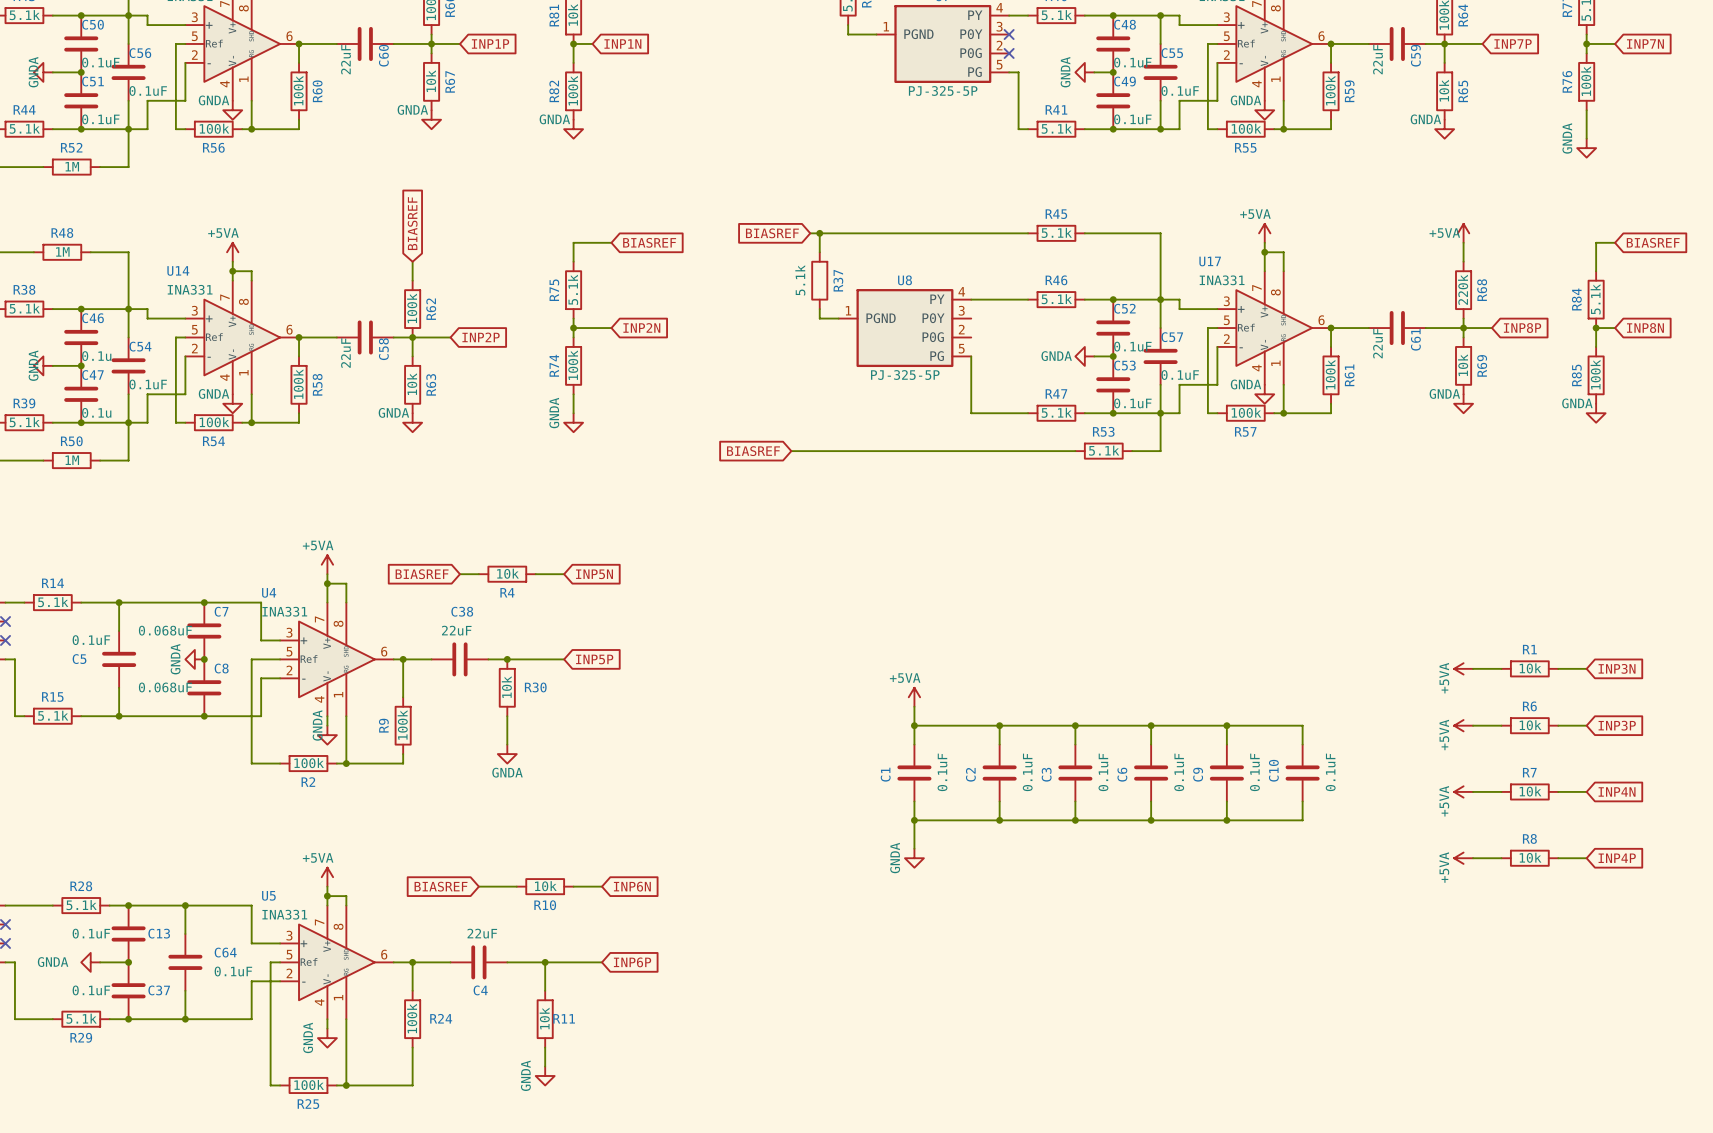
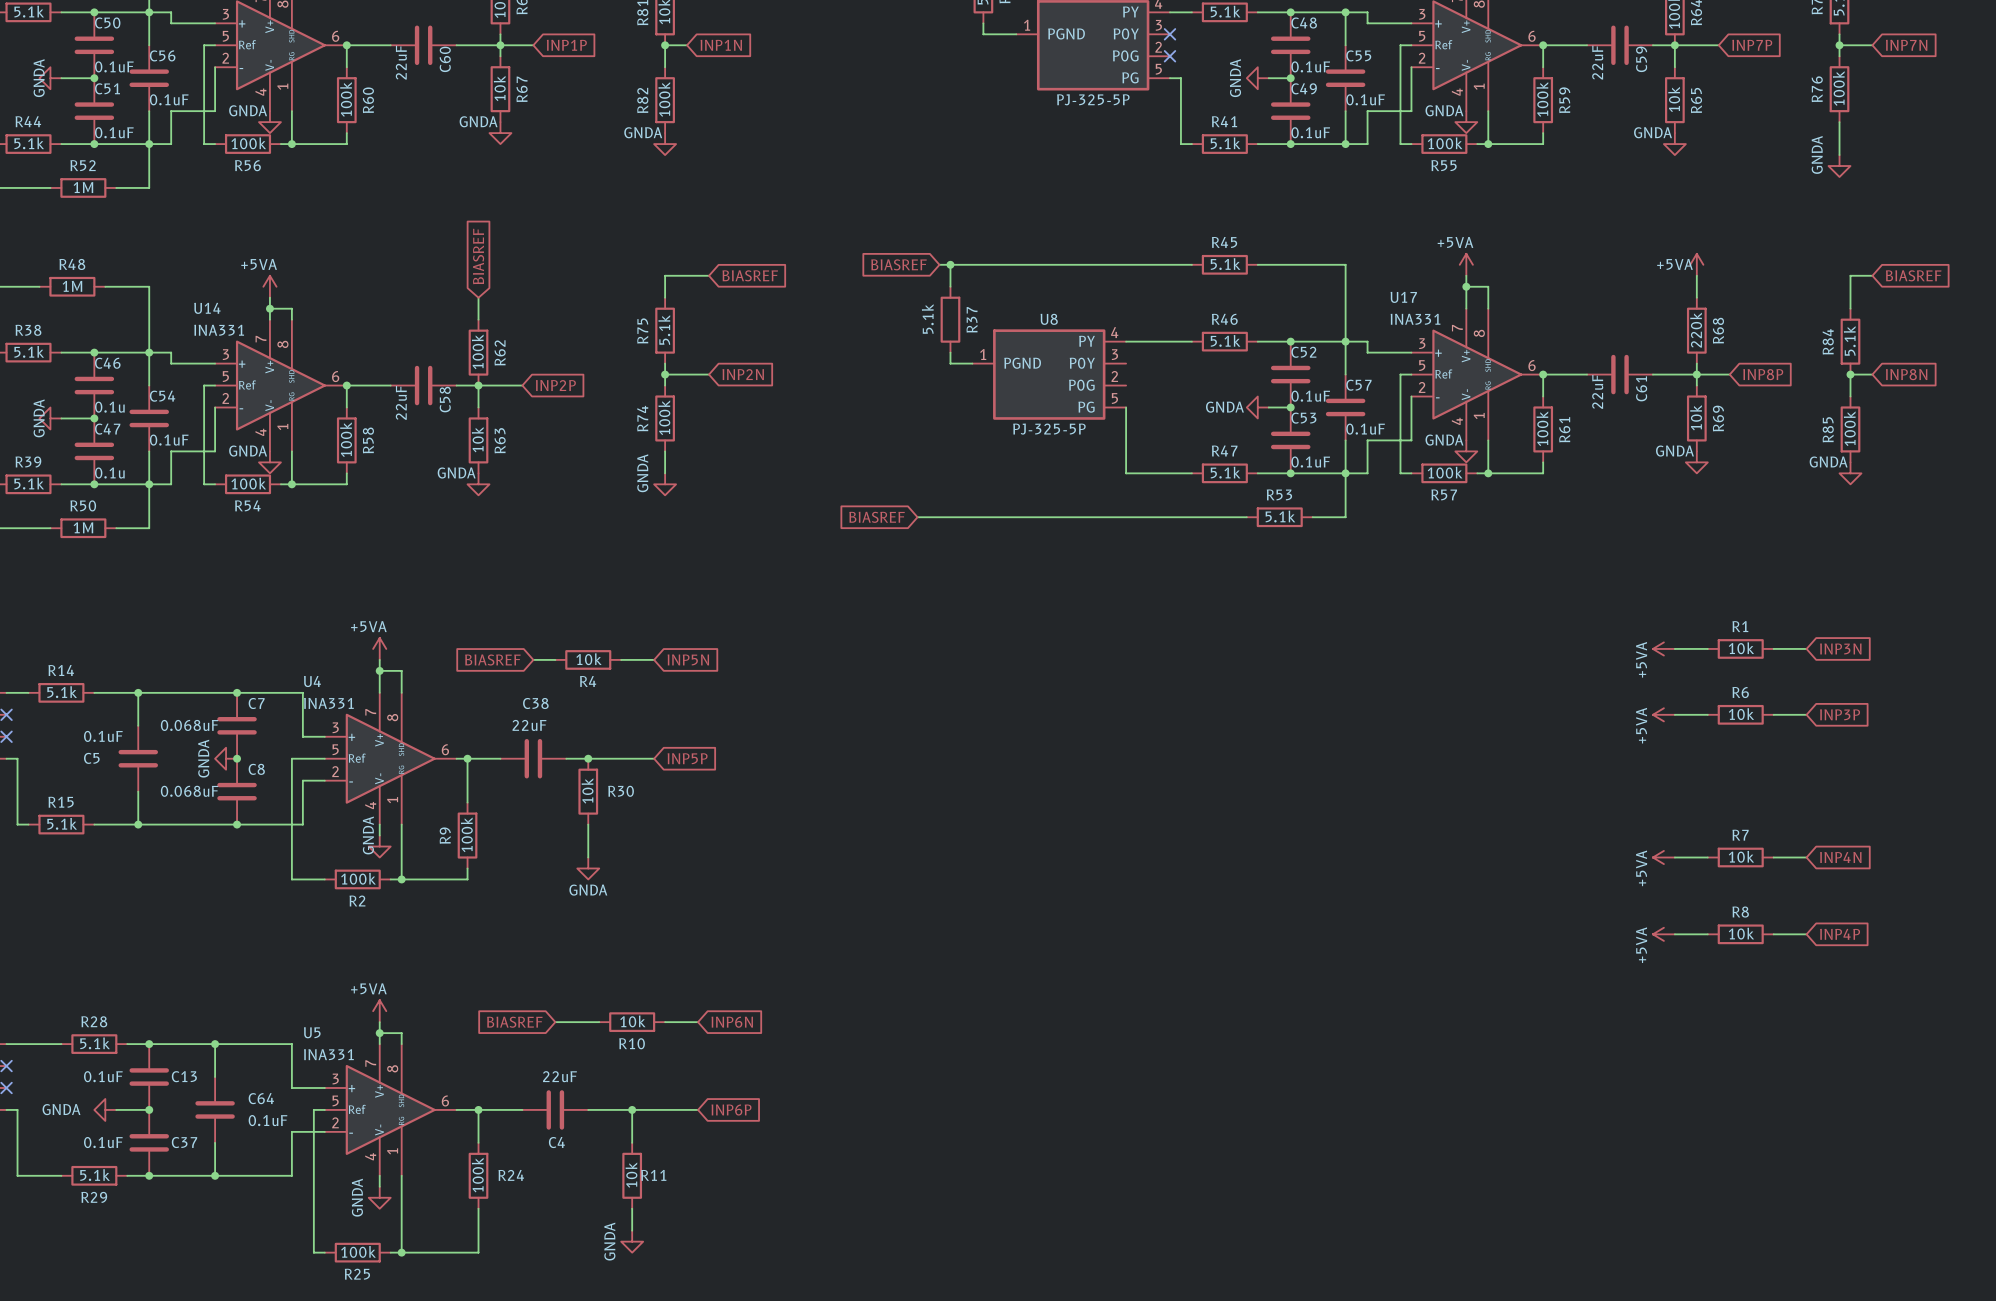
power symbol: none -> +5VA (1663, 648)
power symbol: none -> +5VA (1663, 714)
power symbol: +5VA (1463, 668) -> none
wire: (1473, 668) (1501, 668) -> (1674, 714) (1707, 714)
R1 position: (1529, 668) -> (1740, 648)
wire: (1558, 668) (1586, 668) -> (1773, 714) (1806, 714)
global label position: INP3N (1617, 668) -> INP3N (1840, 648)
power symbol: +5VA (914, 697) -> none
wire: (914, 706) (914, 744) -> none
wire: (914, 725) (1302, 725) (1302, 744) -> none
junction: (914, 725) -> none
wire: (999, 725) (999, 744) -> none
junction: (999, 725) -> none
wire: (1075, 725) (1075, 744) -> none
junction: (1075, 725) -> none
wire: (1151, 725) (1151, 744) -> none
junction: (1151, 725) -> none
wire: (1226, 725) (1226, 744) -> none
junction: (1226, 725) -> none
power symbol: +5VA (1463, 725) -> none
wire: (1473, 725) (1501, 725) -> (1674, 648) (1707, 648)
R6 position: (1529, 725) -> (1740, 714)
wire: (1558, 725) (1586, 725) -> (1773, 648) (1806, 648)
global label position: INP3P (1617, 725) -> INP3P (1840, 714)
power symbol: none -> +5VA (1663, 857)
C1: 0.1uF (914, 773) -> none
C2: 0.1uF (999, 773) -> none
C3: 0.1uF (1075, 773) -> none
C6: 0.1uF (1151, 773) -> none
C9: 0.1uF (1226, 773) -> none
C10: 0.1uF (1302, 773) -> none
power symbol: +5VA (1463, 791) -> none
wire: (1473, 791) (1501, 791) -> (1674, 857) (1707, 857)
R7 position: (1529, 791) -> (1740, 857)
wire: (1558, 791) (1586, 791) -> (1773, 857) (1806, 857)
global label position: INP4N (1617, 791) -> INP4N (1840, 857)
wire: (914, 801) (914, 848) -> none
wire: (999, 801) (999, 820) -> none
wire: (1075, 801) (1075, 820) -> none
wire: (1151, 801) (1151, 820) -> none
wire: (1226, 801) (1226, 820) -> none
wire: (1302, 801) (1302, 820) (914, 820) -> none
power symbol: none -> +5VA (1663, 934)
junction: (914, 820) -> none
junction: (999, 820) -> none
junction: (1075, 820) -> none
junction: (1151, 820) -> none
junction: (1226, 820) -> none
power symbol: GNDA (914, 858) -> none
power symbol: +5VA (1463, 858) -> none
wire: (1473, 858) (1501, 858) -> (1674, 934) (1707, 934)
R8 position: (1529, 858) -> (1740, 934)
wire: (1558, 858) (1586, 858) -> (1773, 934) (1806, 934)
global label position: INP4P (1617, 858) -> INP4P (1840, 934)

